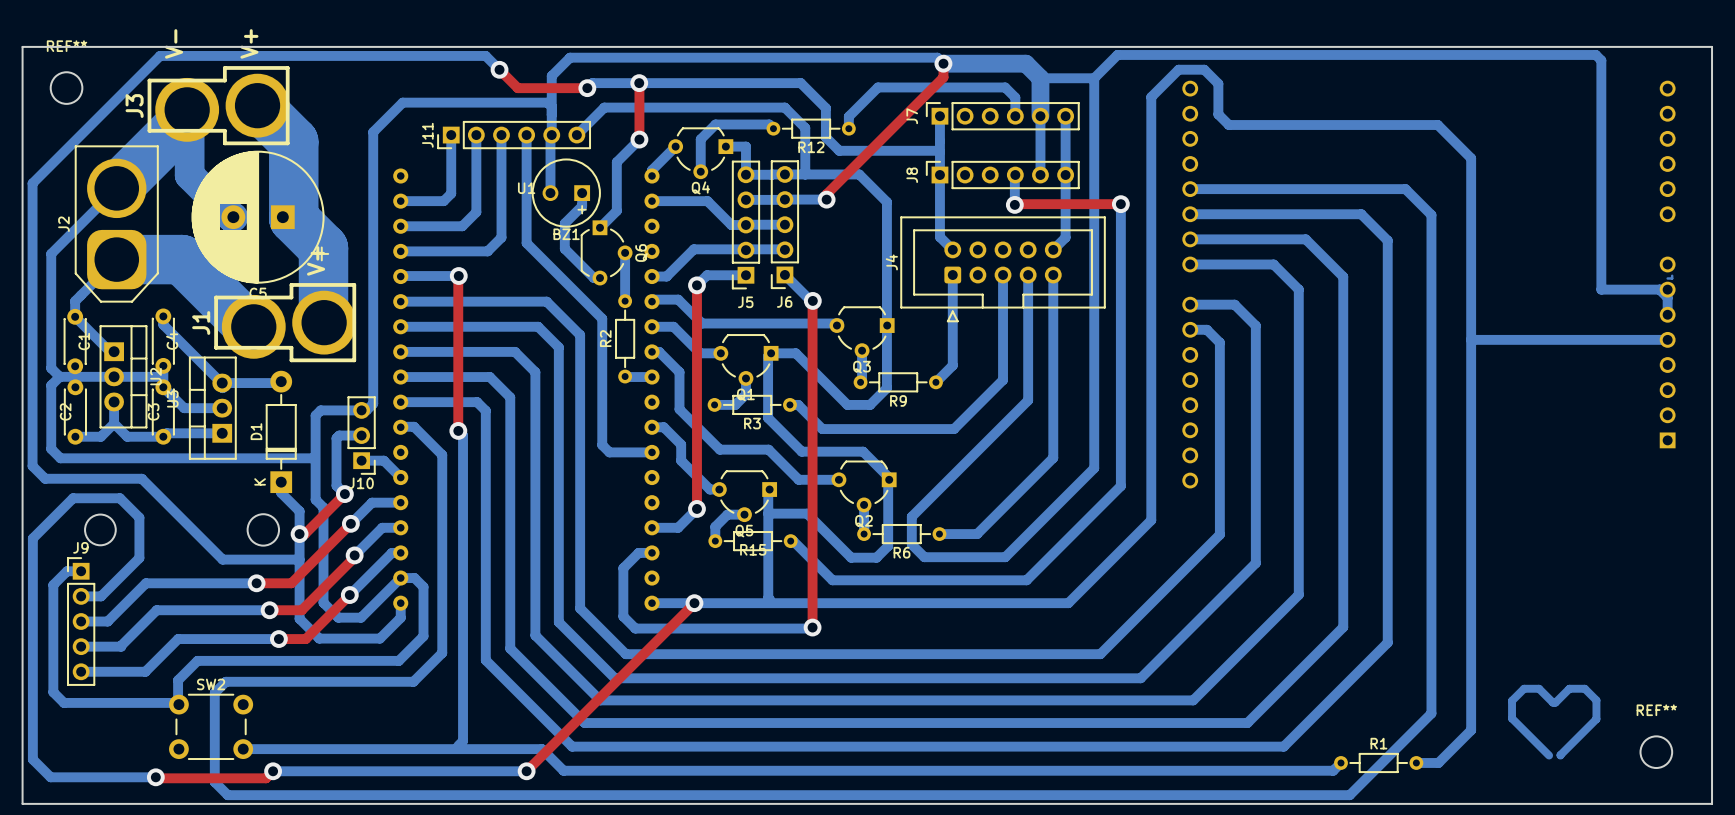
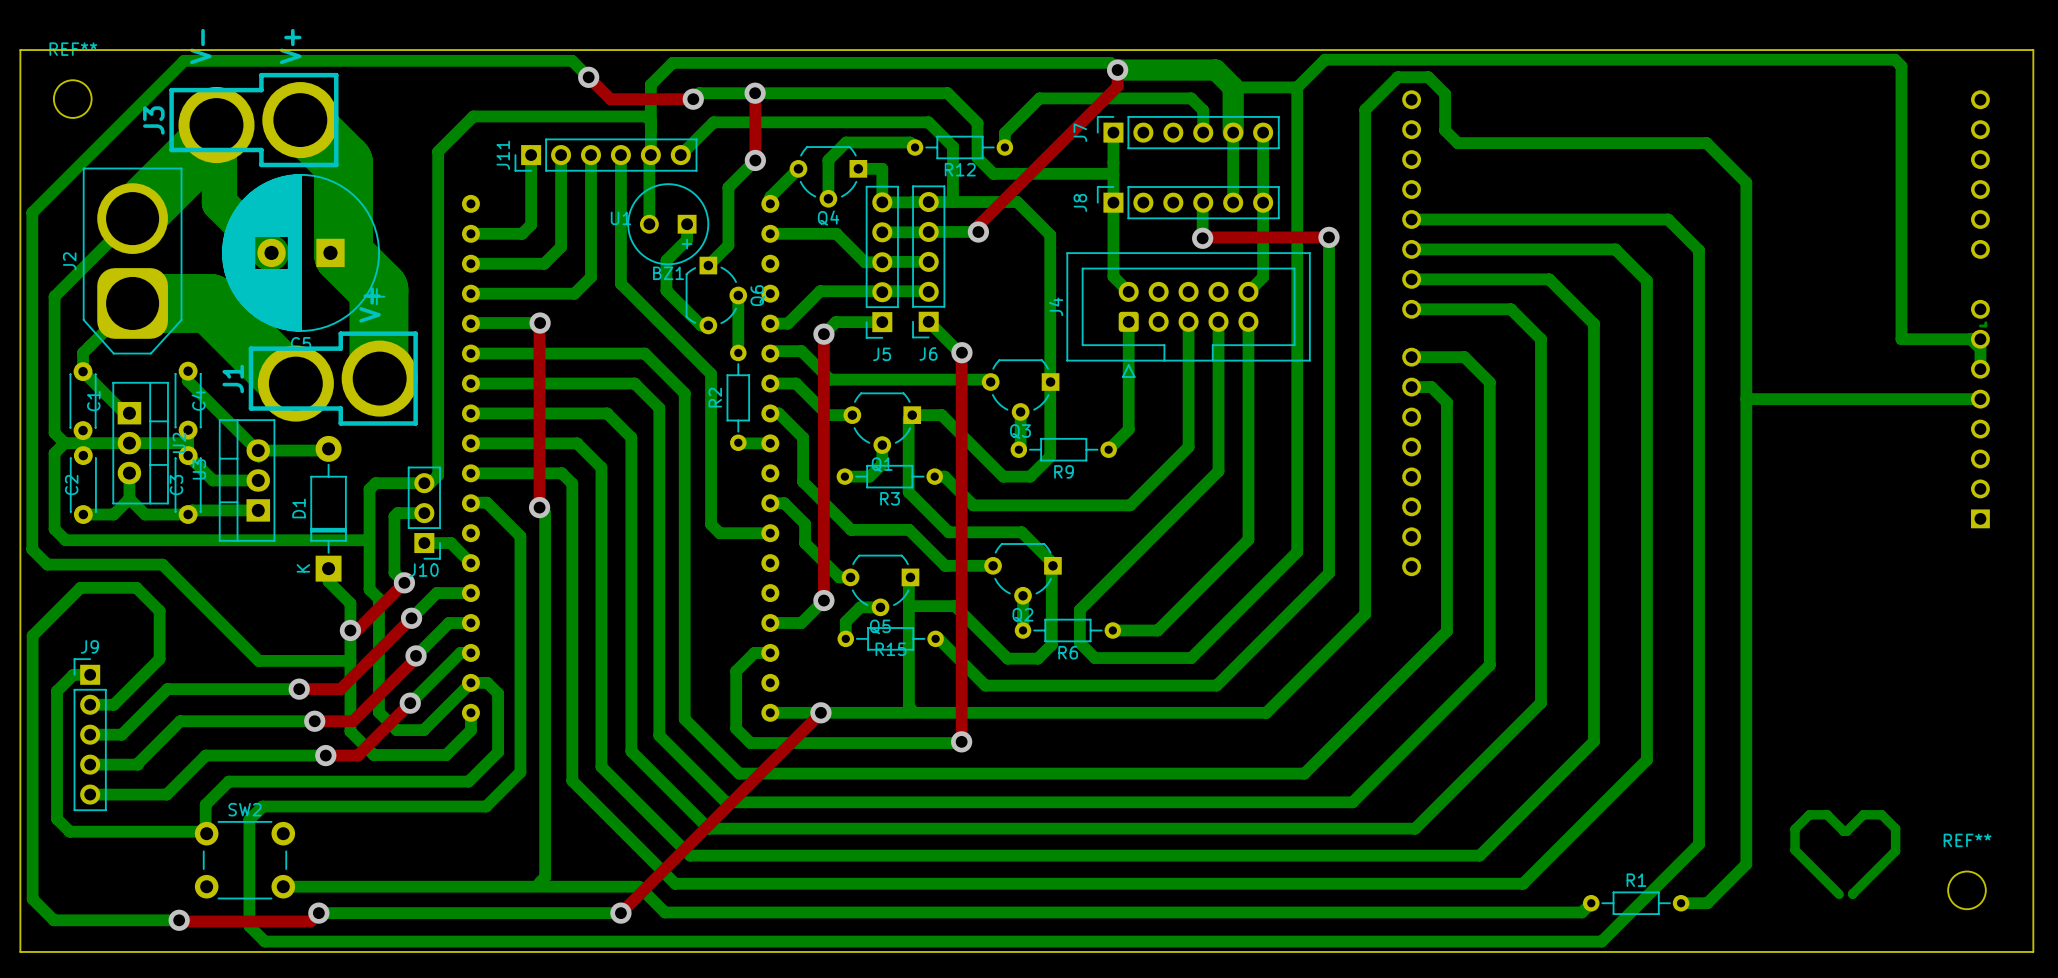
round board edge: [247, 513, 280, 546] -> none
round board edge: [84, 514, 117, 546] -> none

